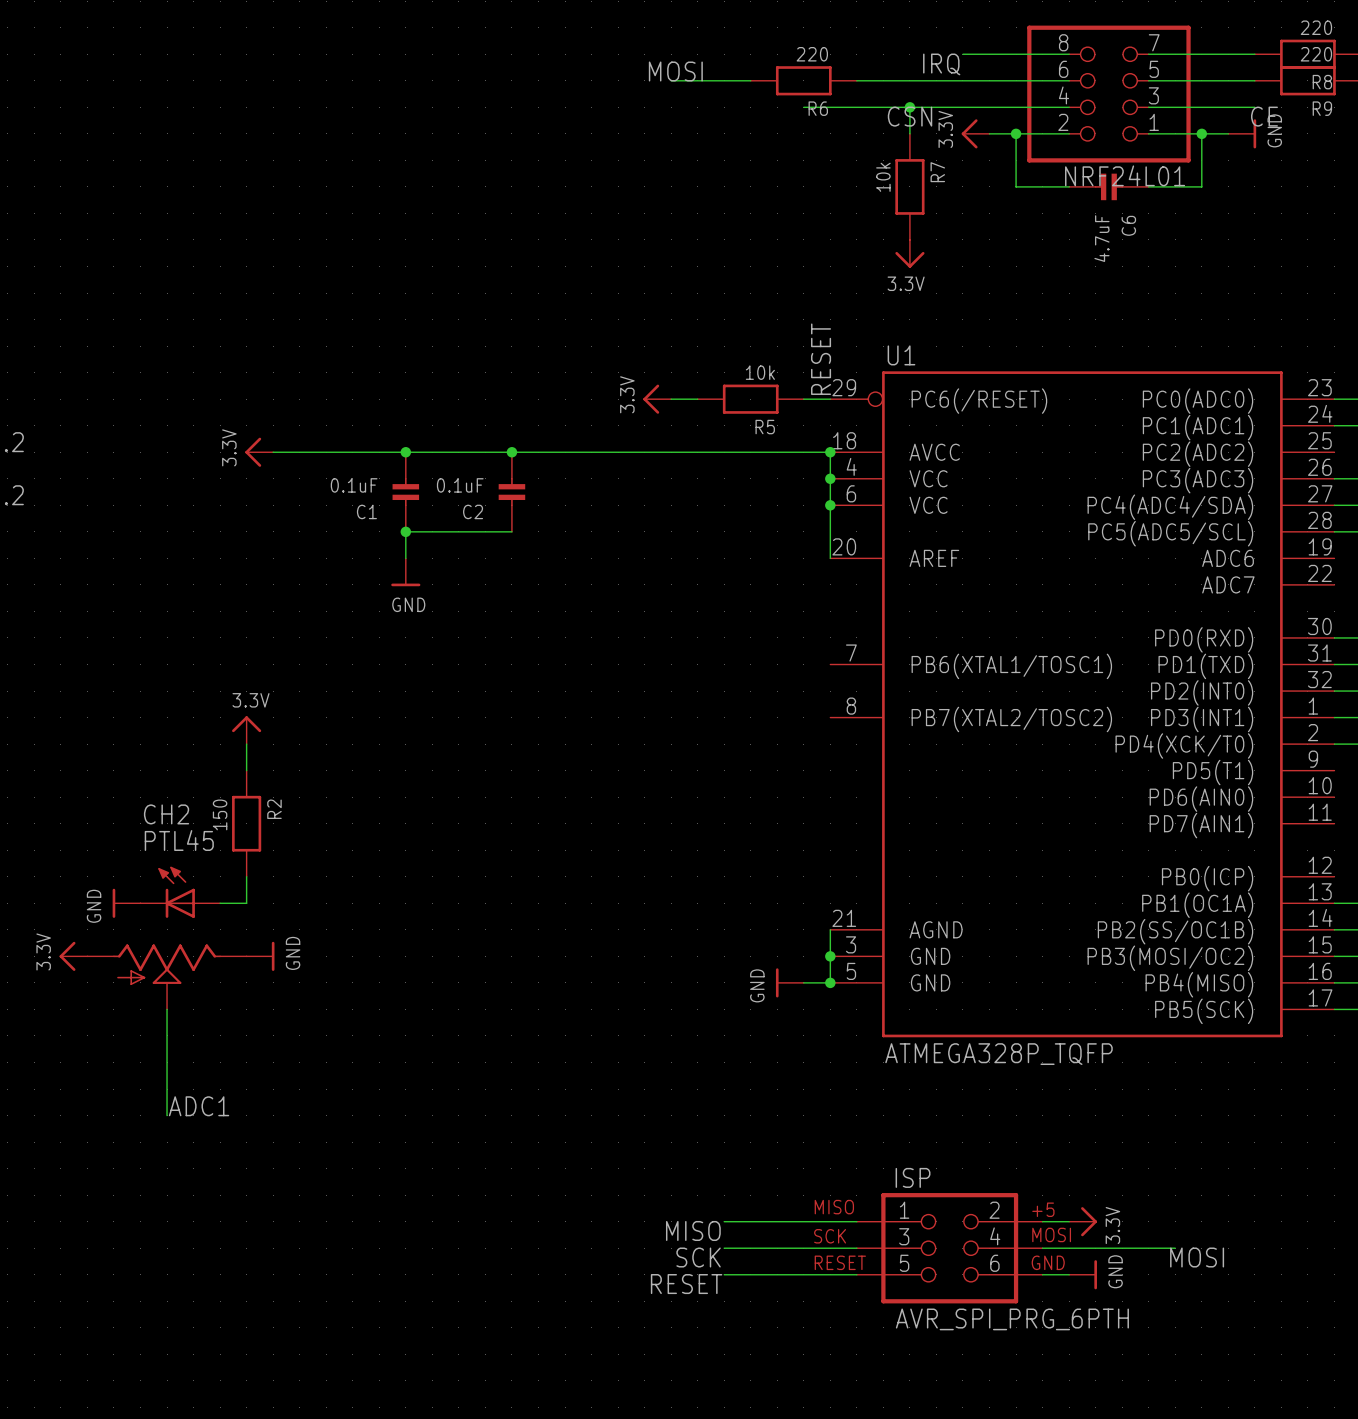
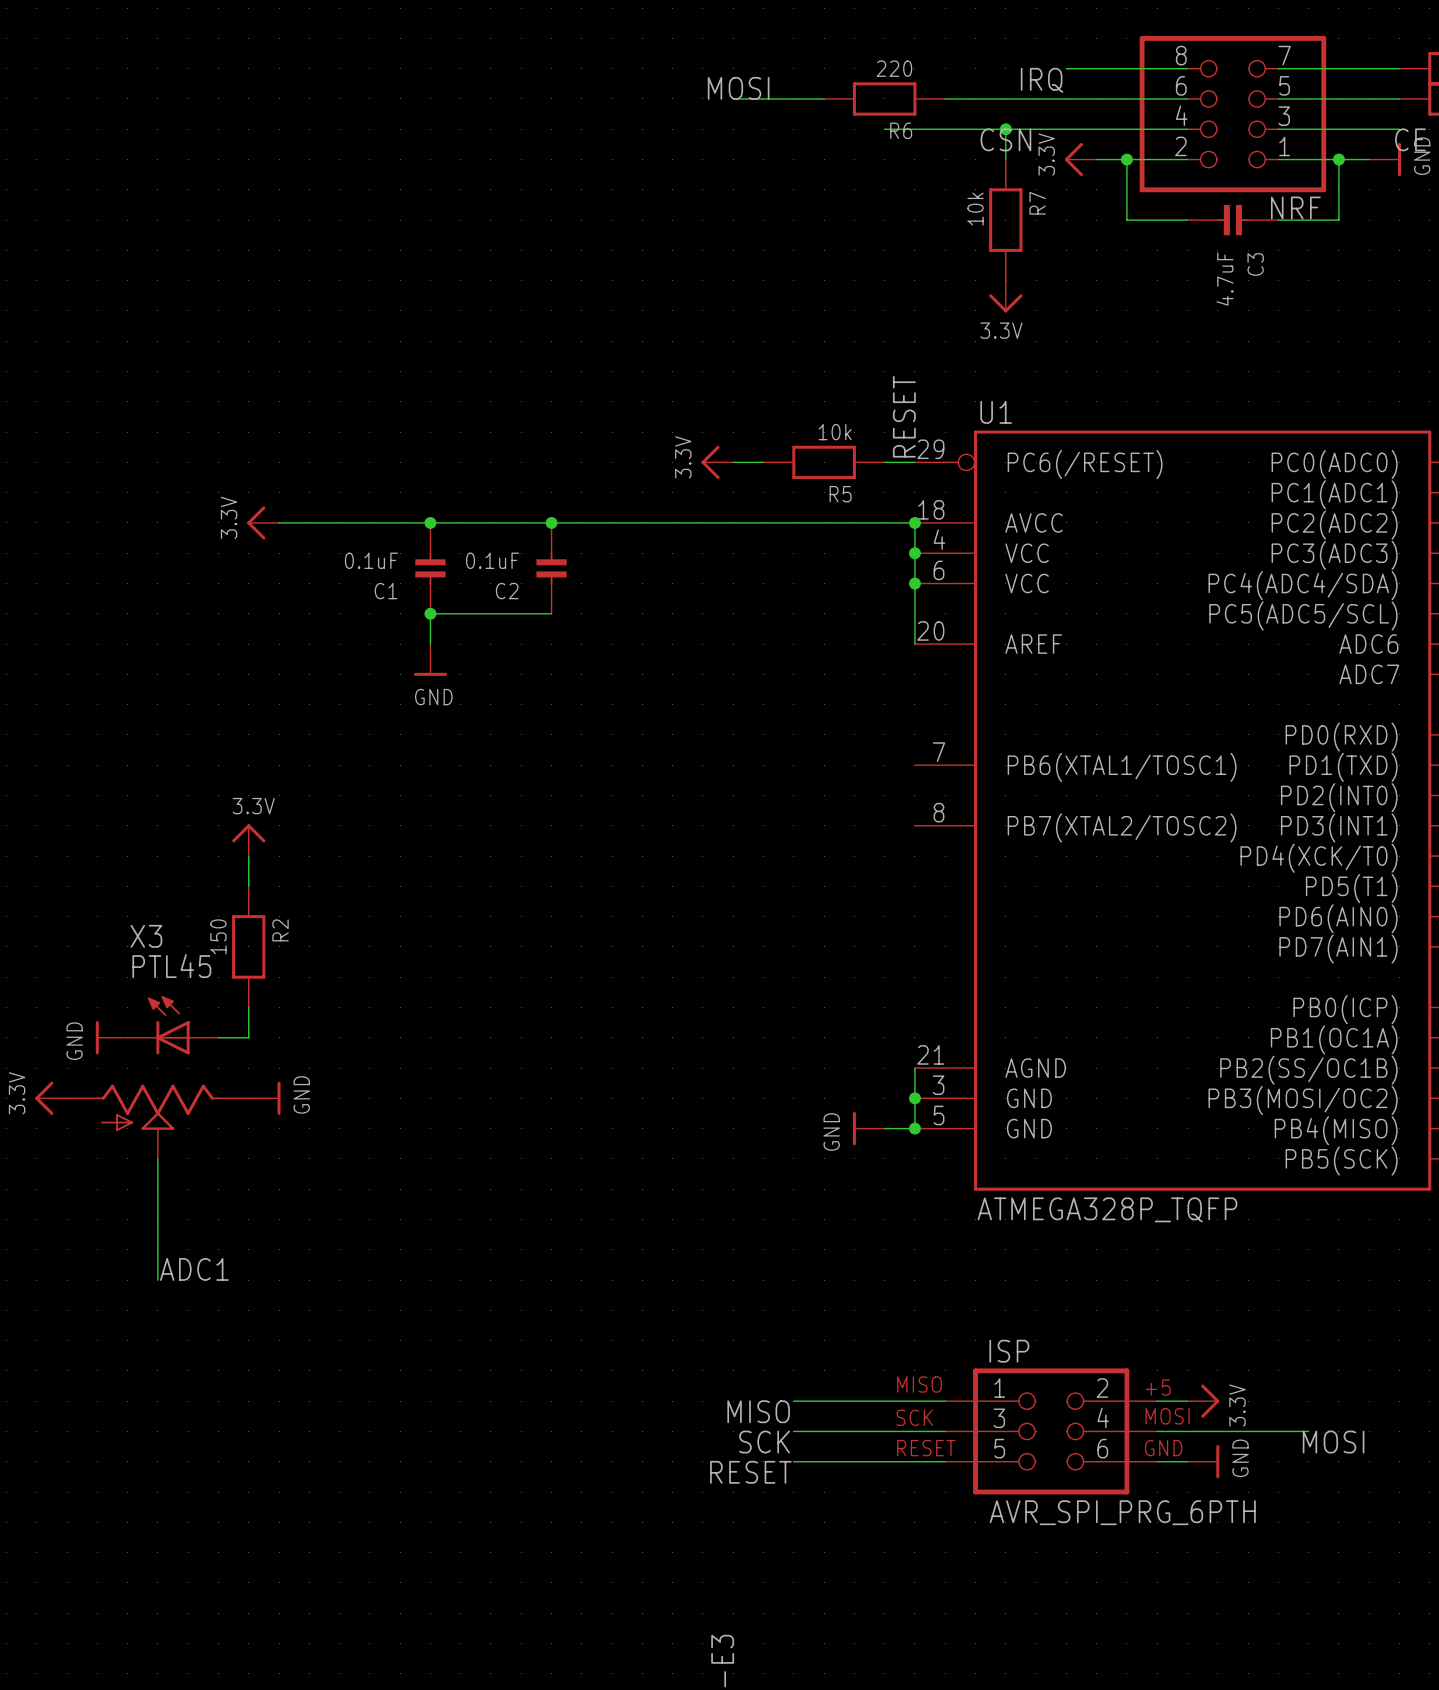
NRF24L01 name: NRF24L01 (1125, 175) -> NRF (1295, 208)
C6 name: C6 (1128, 225) -> C3 (1255, 264)
CH2 name: CH2 (166, 814) -> X3 (146, 936)

